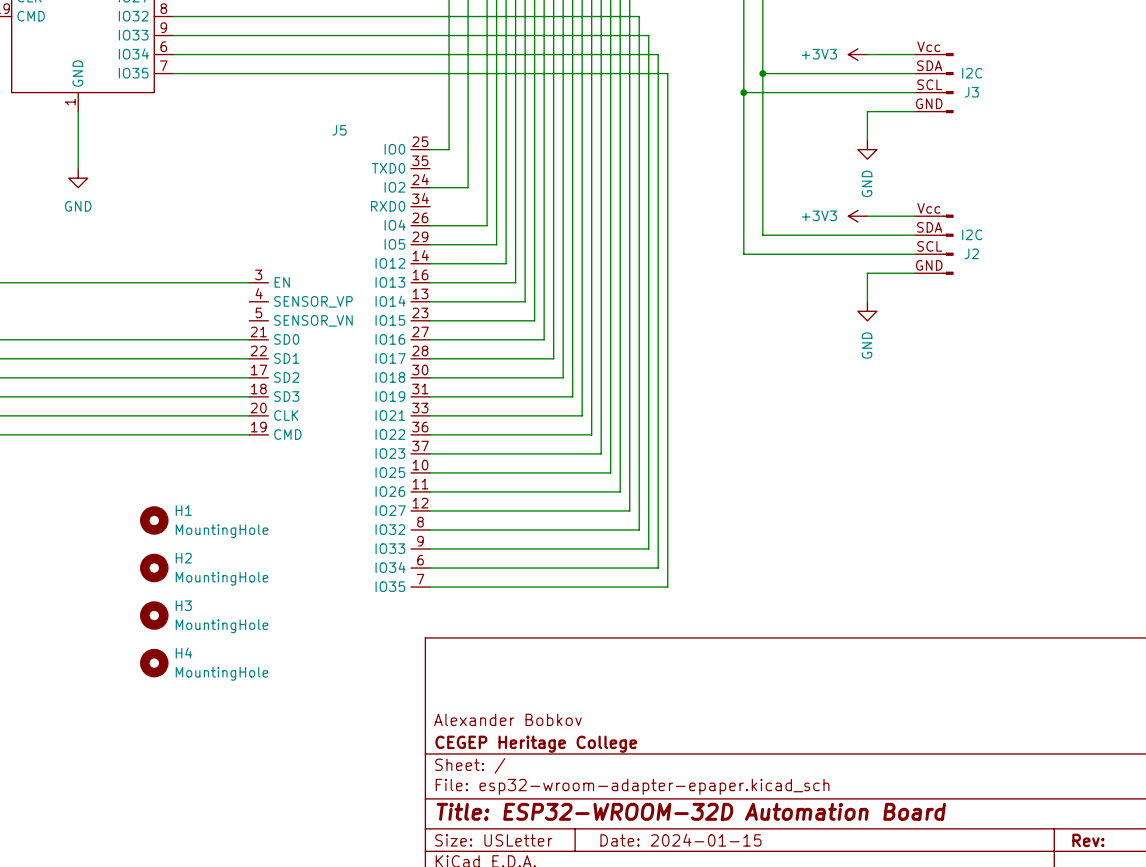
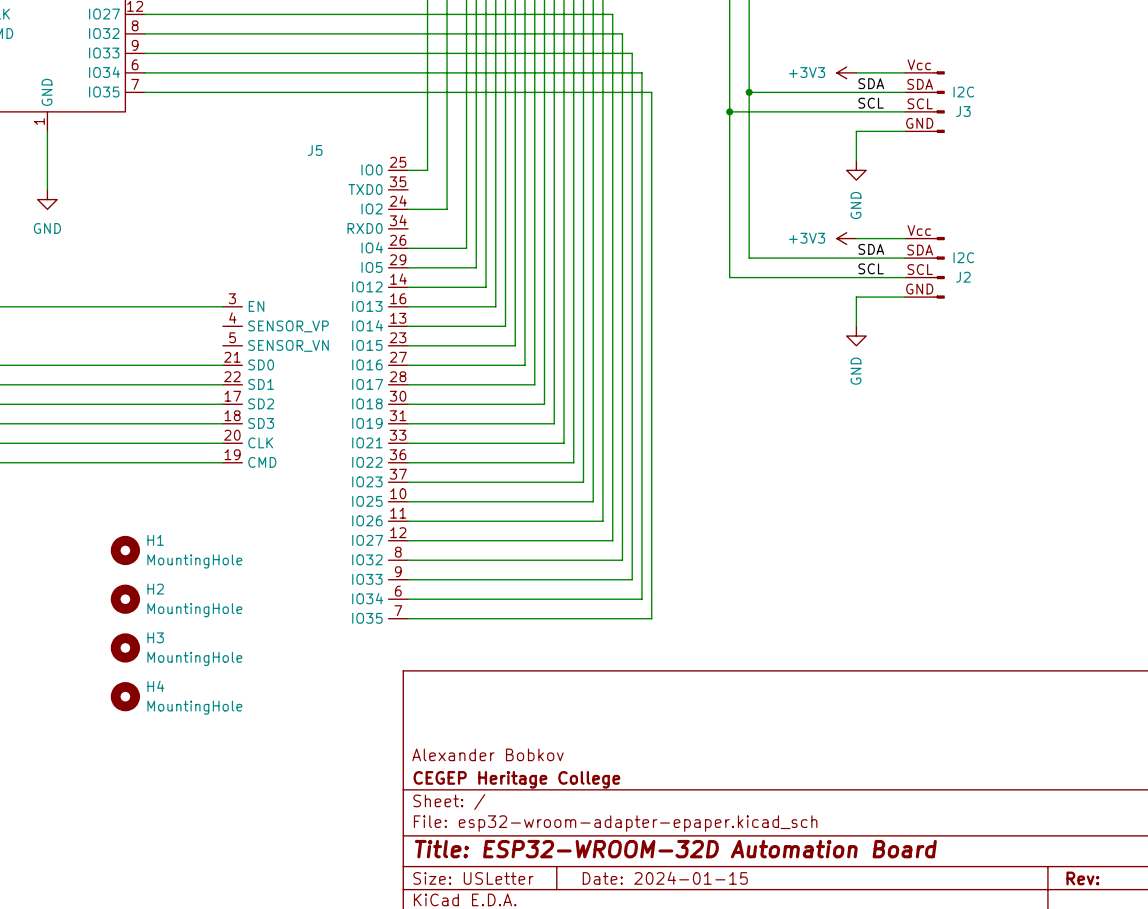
label: none -> SDA (871, 83)
label: none -> SCL (871, 103)
label: none -> SDA (871, 249)
label: none -> SCL (871, 268)

